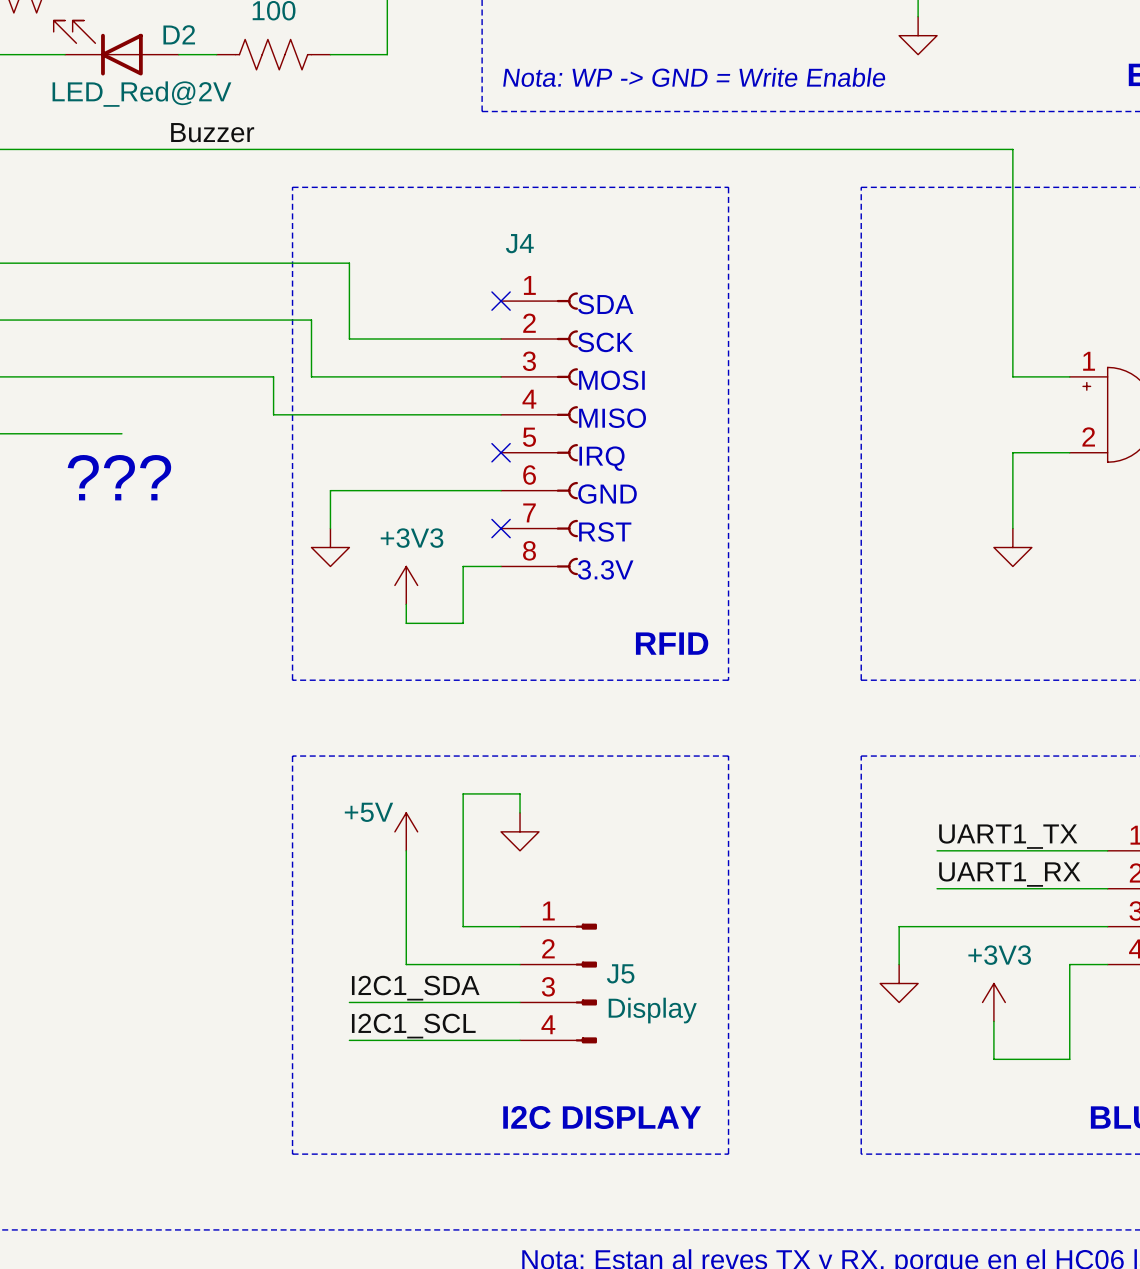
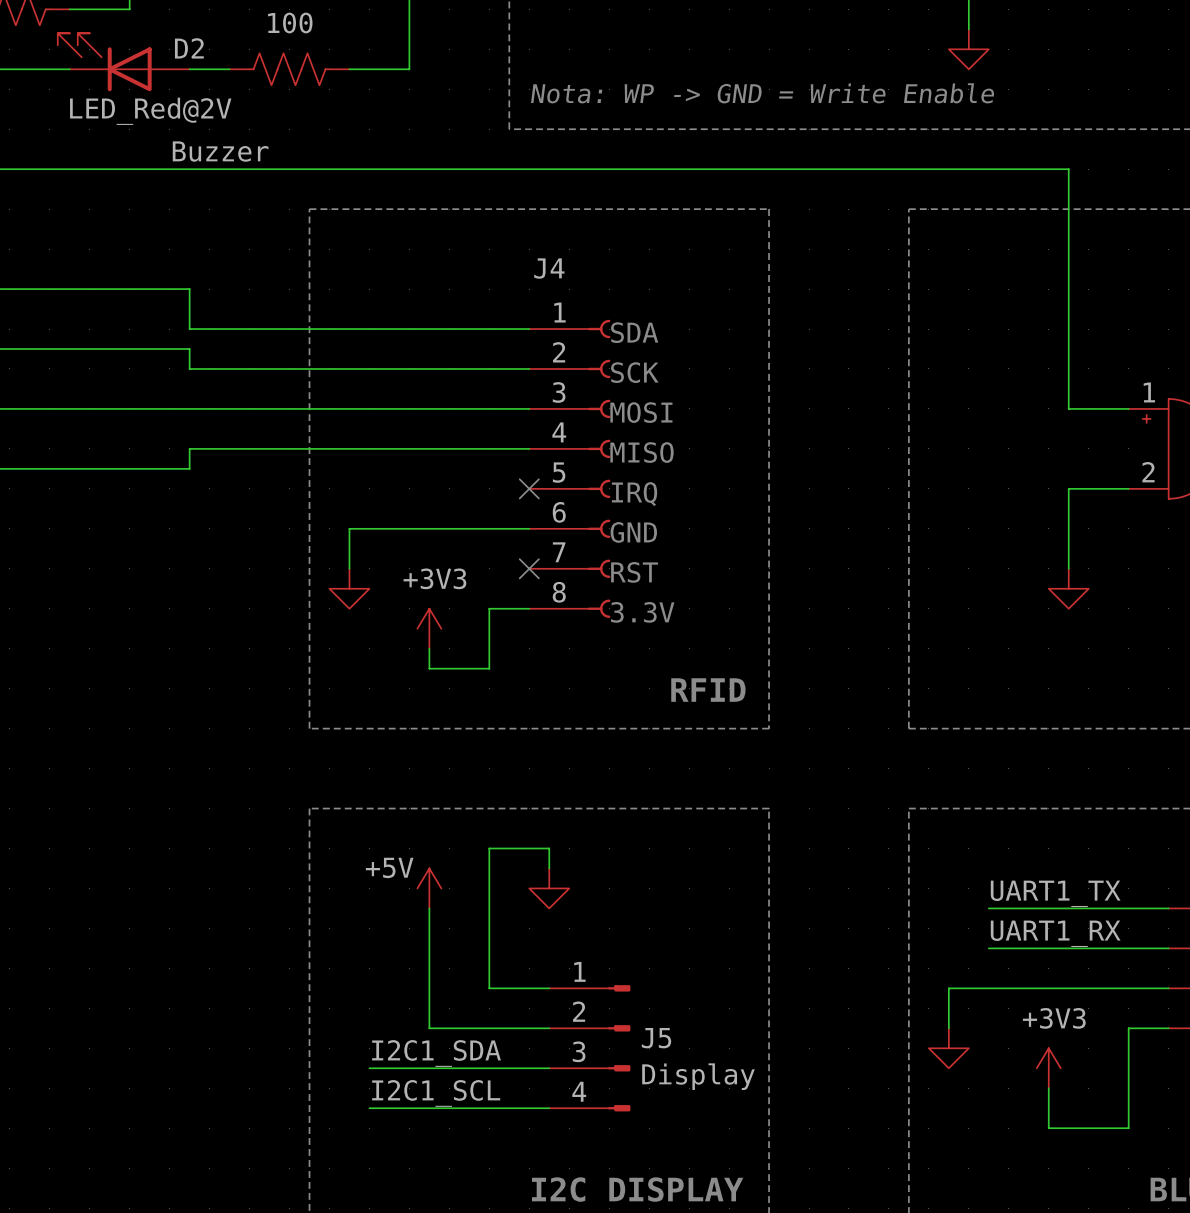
wire: (178, 263) (349, 263) (349, 338) -> (189, 289) (189, 329) (529, 329)
no-connect mark: (501, 301) -> none
wire: (178, 320) (311, 320) (311, 376) -> (189, 349) (189, 368) (369, 368)
wire: (273, 376) (273, 414) -> (289, 408) (329, 408)
wire: none -> (289, 448) (189, 448) (189, 468) (129, 468)
text: ??? (119, 477) -> none

